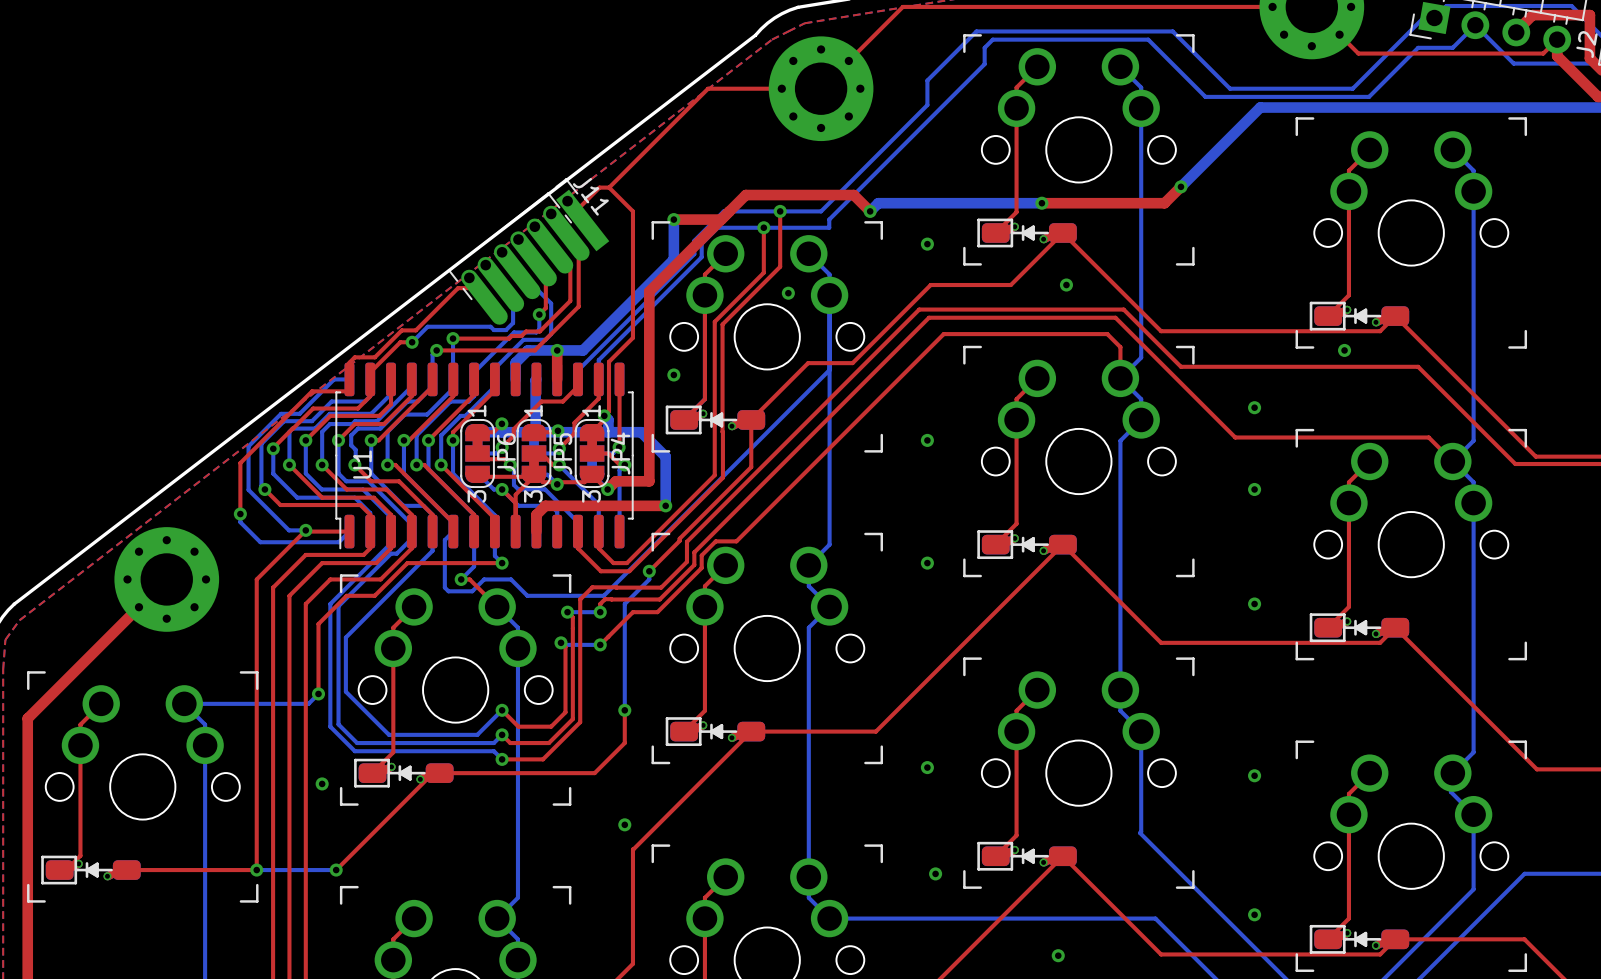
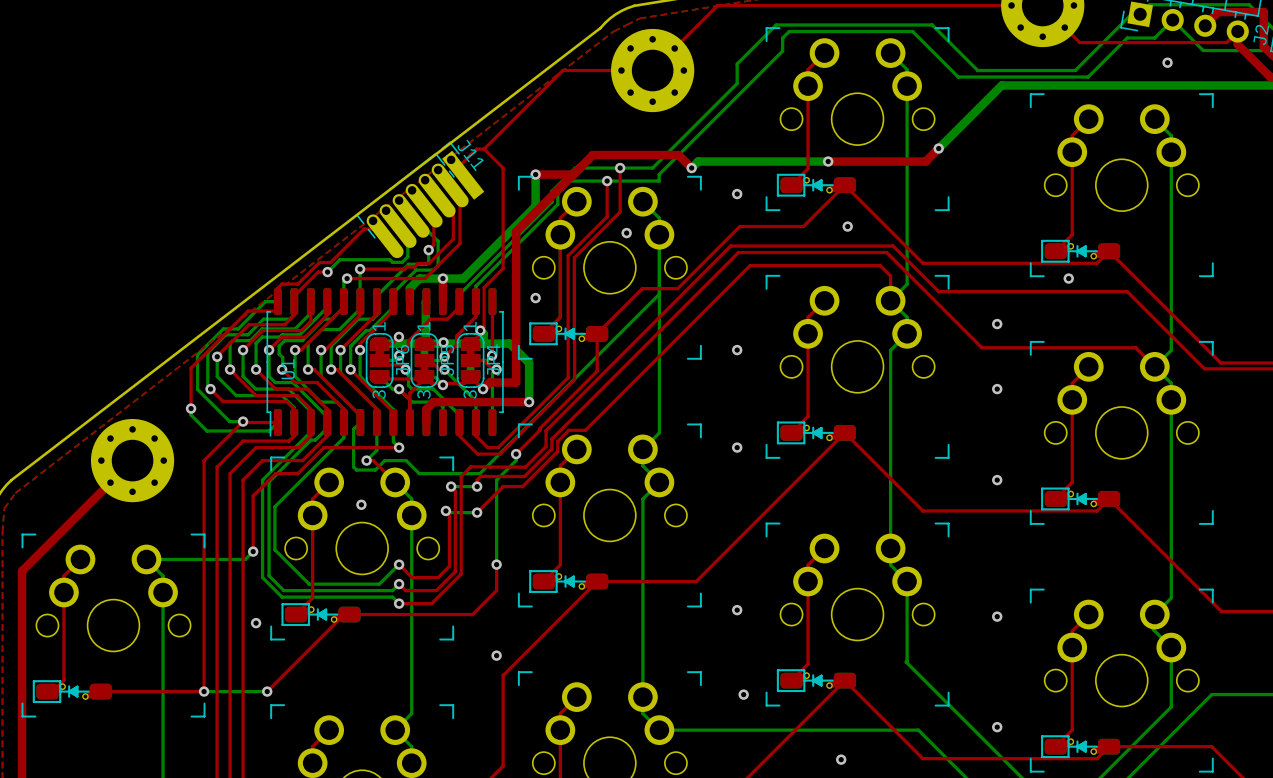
via: none -> (1167, 62)
via: none -> (361, 504)

